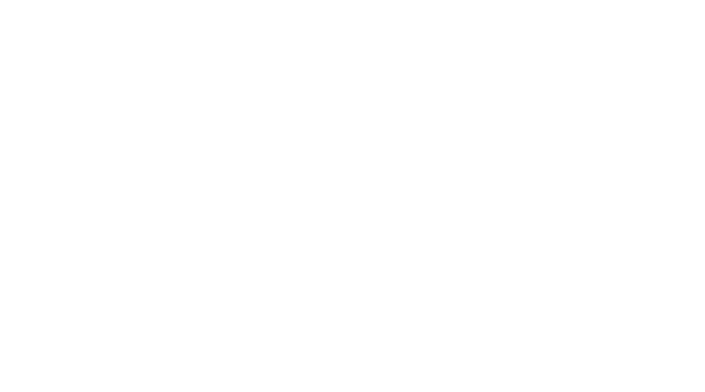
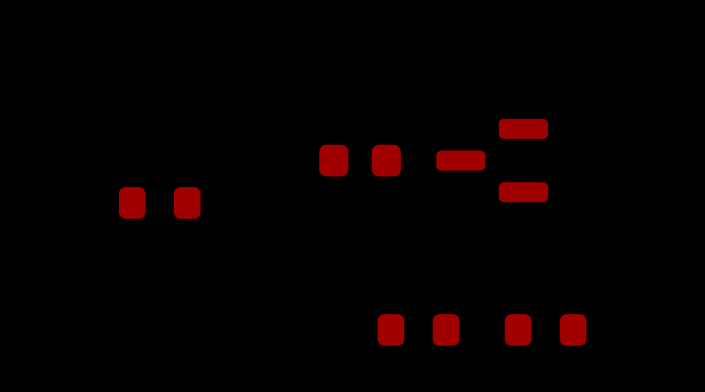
part: none -> (360, 160)
part: none -> (492, 160)
part: none -> (159, 202)
part: none -> (418, 329)
part: none -> (545, 329)

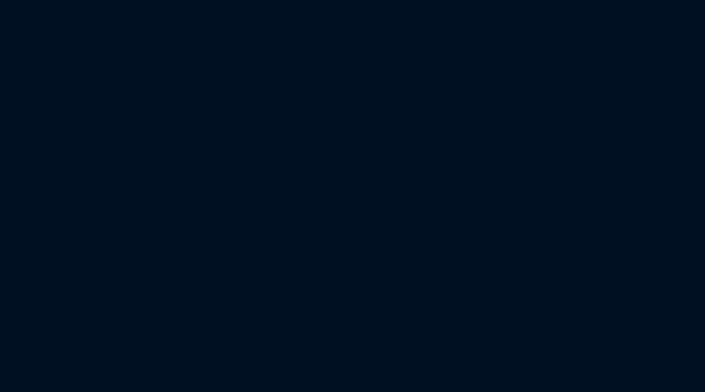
part: (360, 160) -> none
part: (492, 160) -> none
part: (159, 202) -> none
part: (418, 329) -> none
part: (545, 329) -> none

